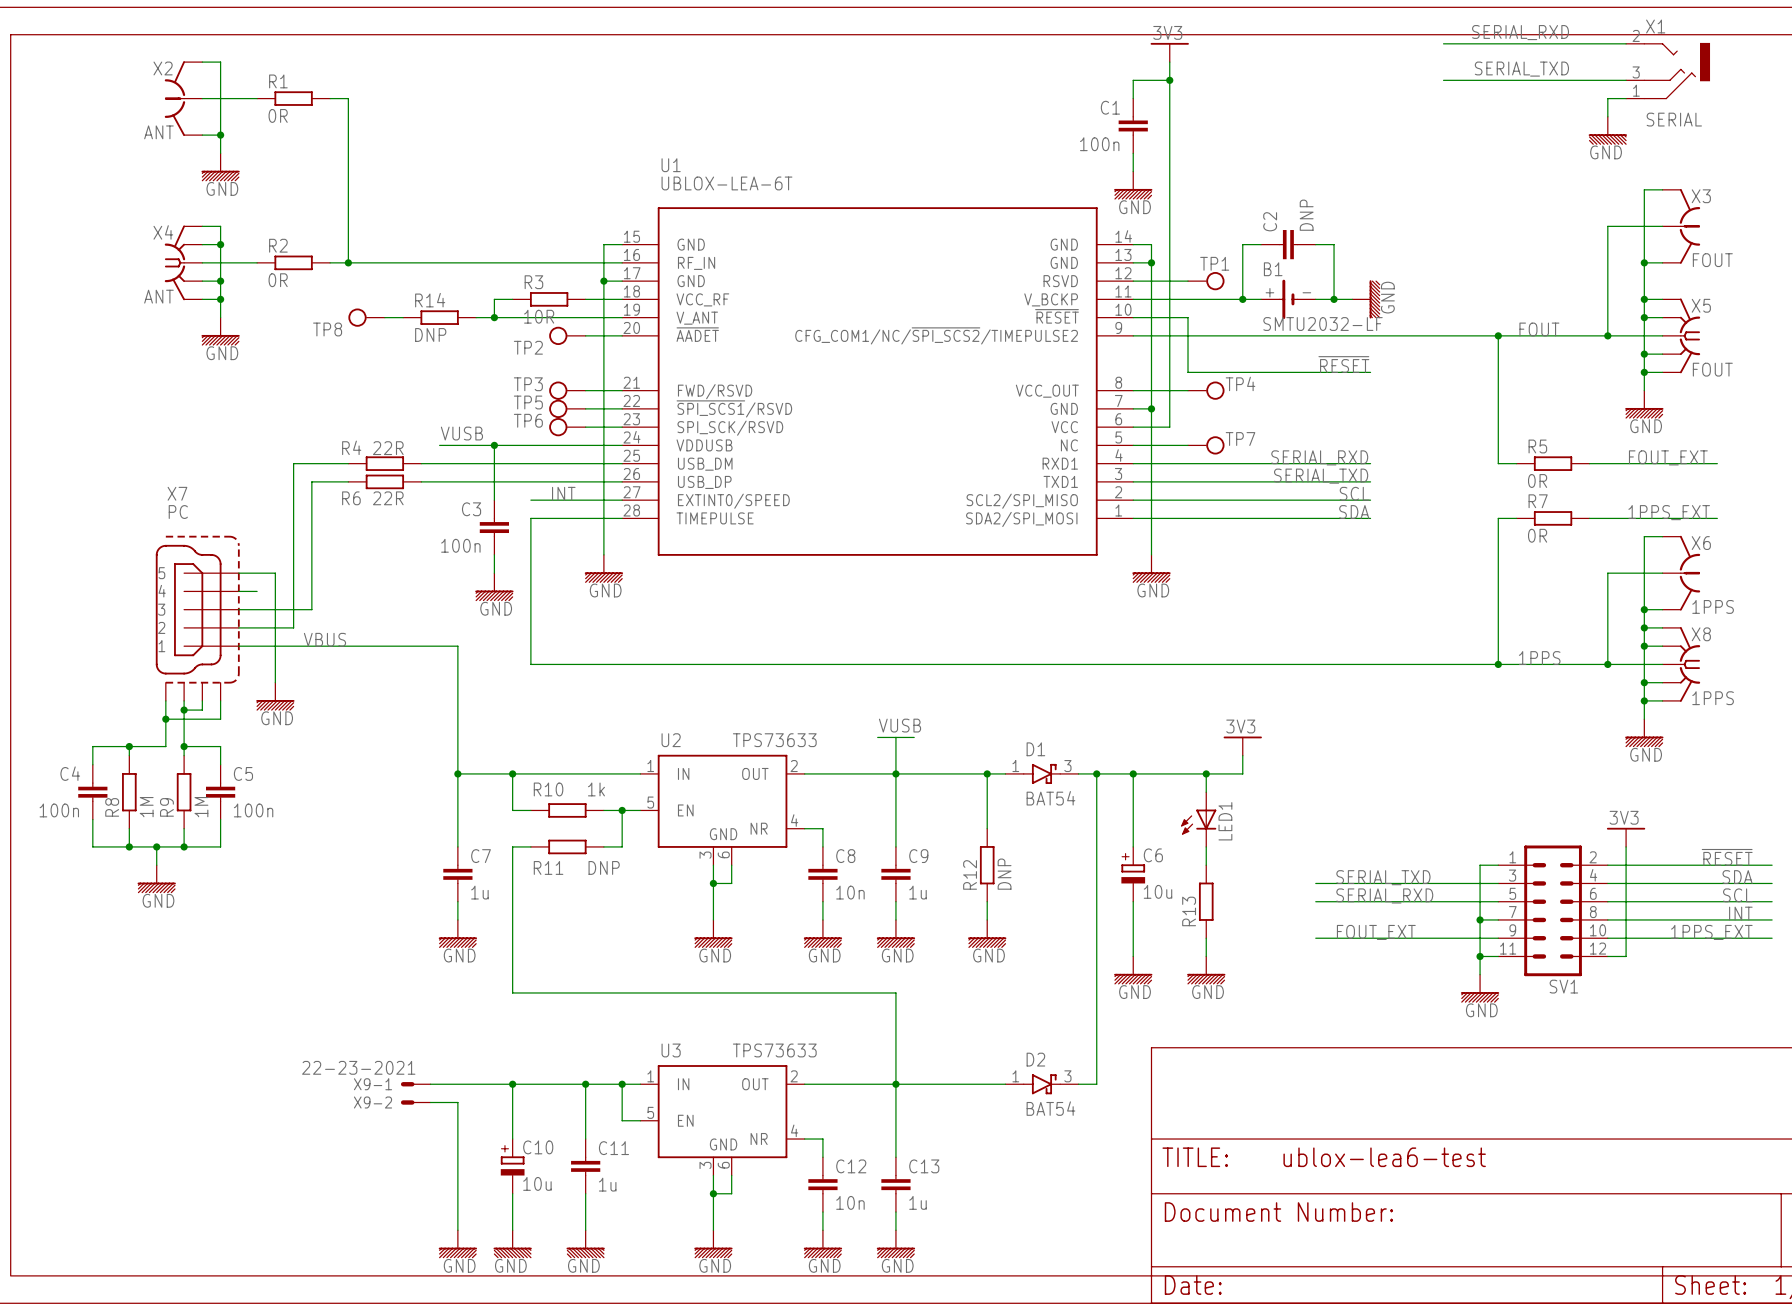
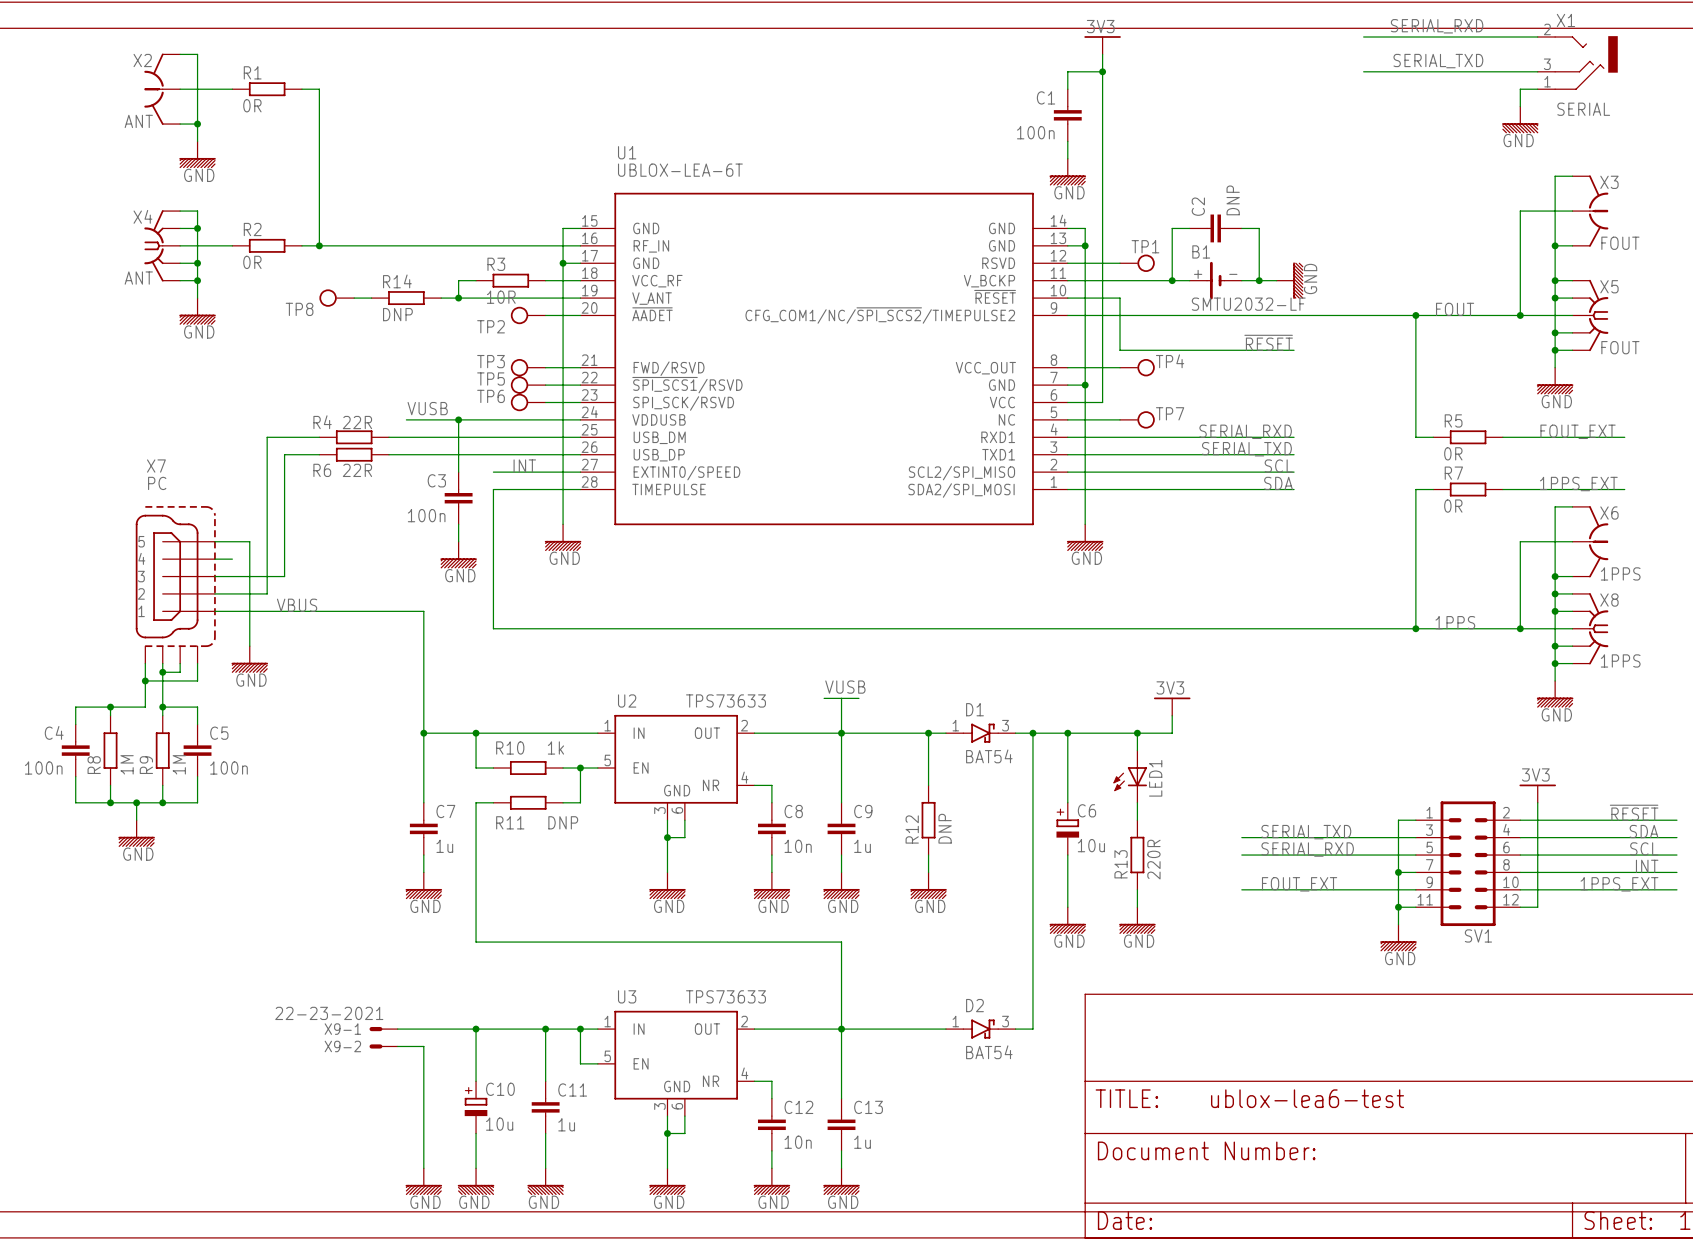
R13 value: none -> 220R (1153, 859)

